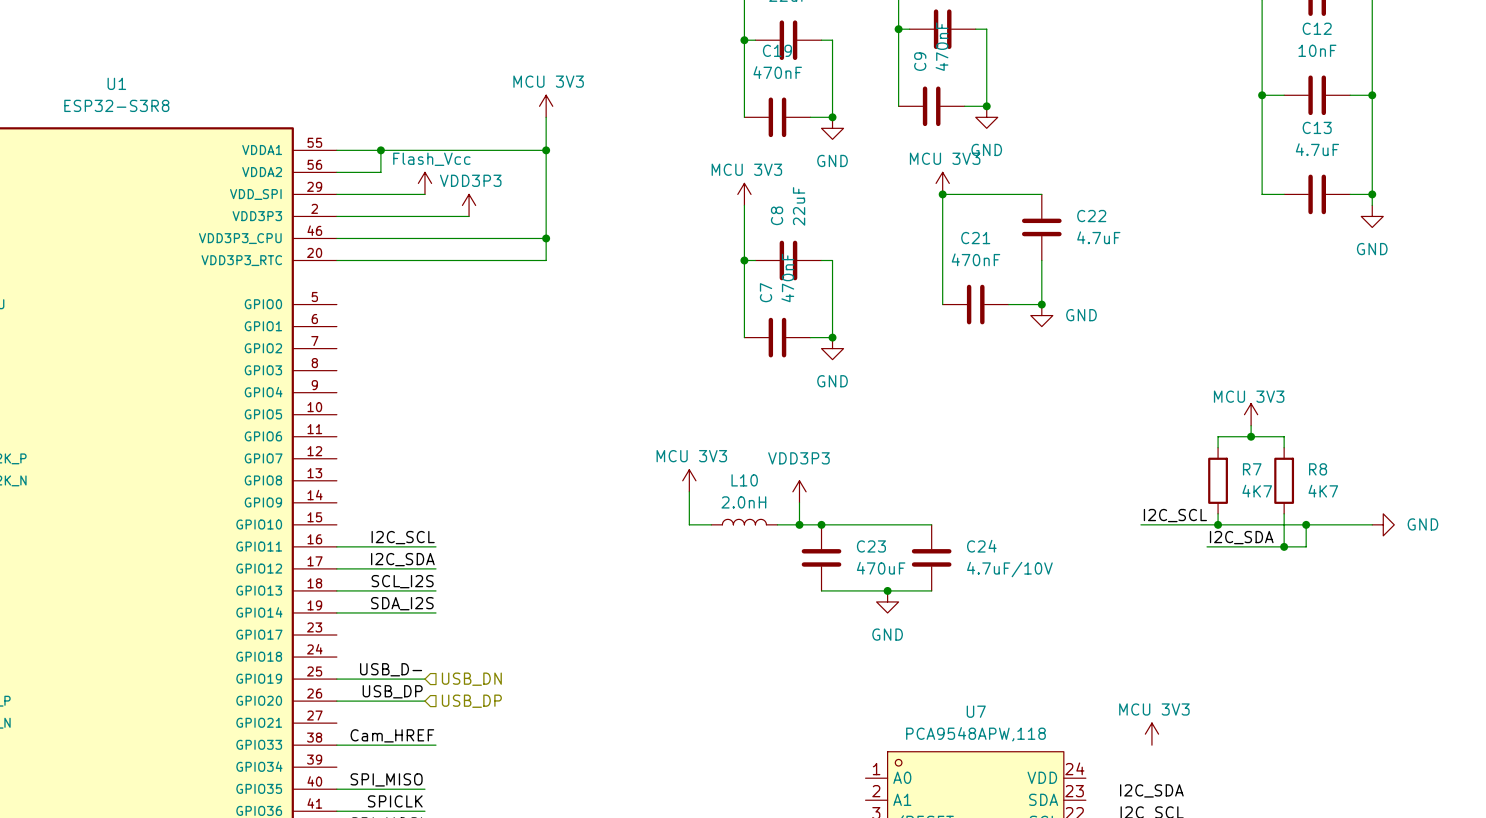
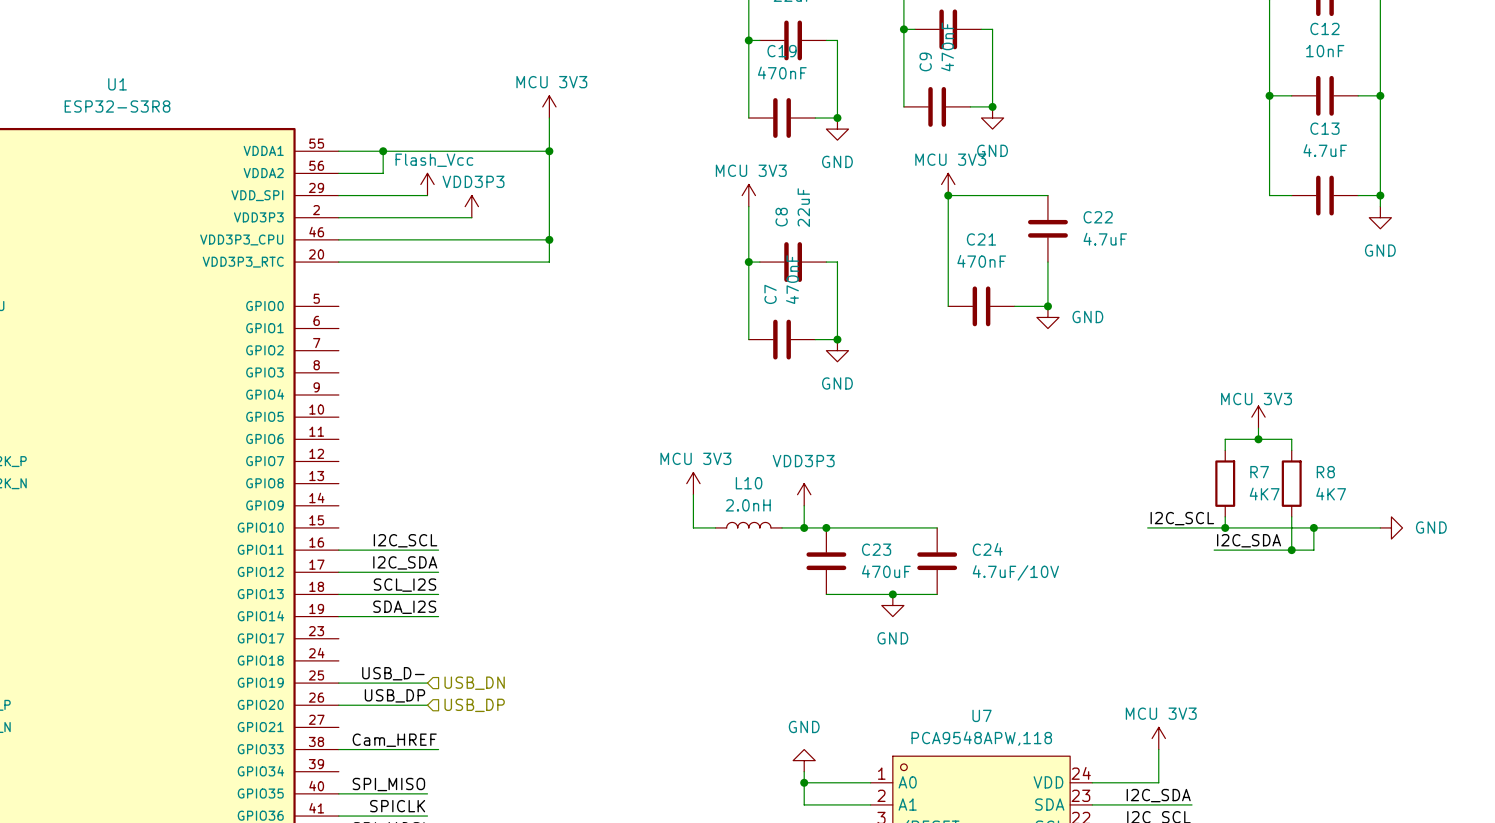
wire: none -> (1158, 749) (1158, 782) (1092, 782)
power symbol: none -> GND (804, 760)
wire: none -> (804, 771) (804, 804) (870, 804)
wire: none -> (804, 782) (870, 782)
junction: none -> (804, 782)
wire: none -> (1092, 804) (1192, 804)

